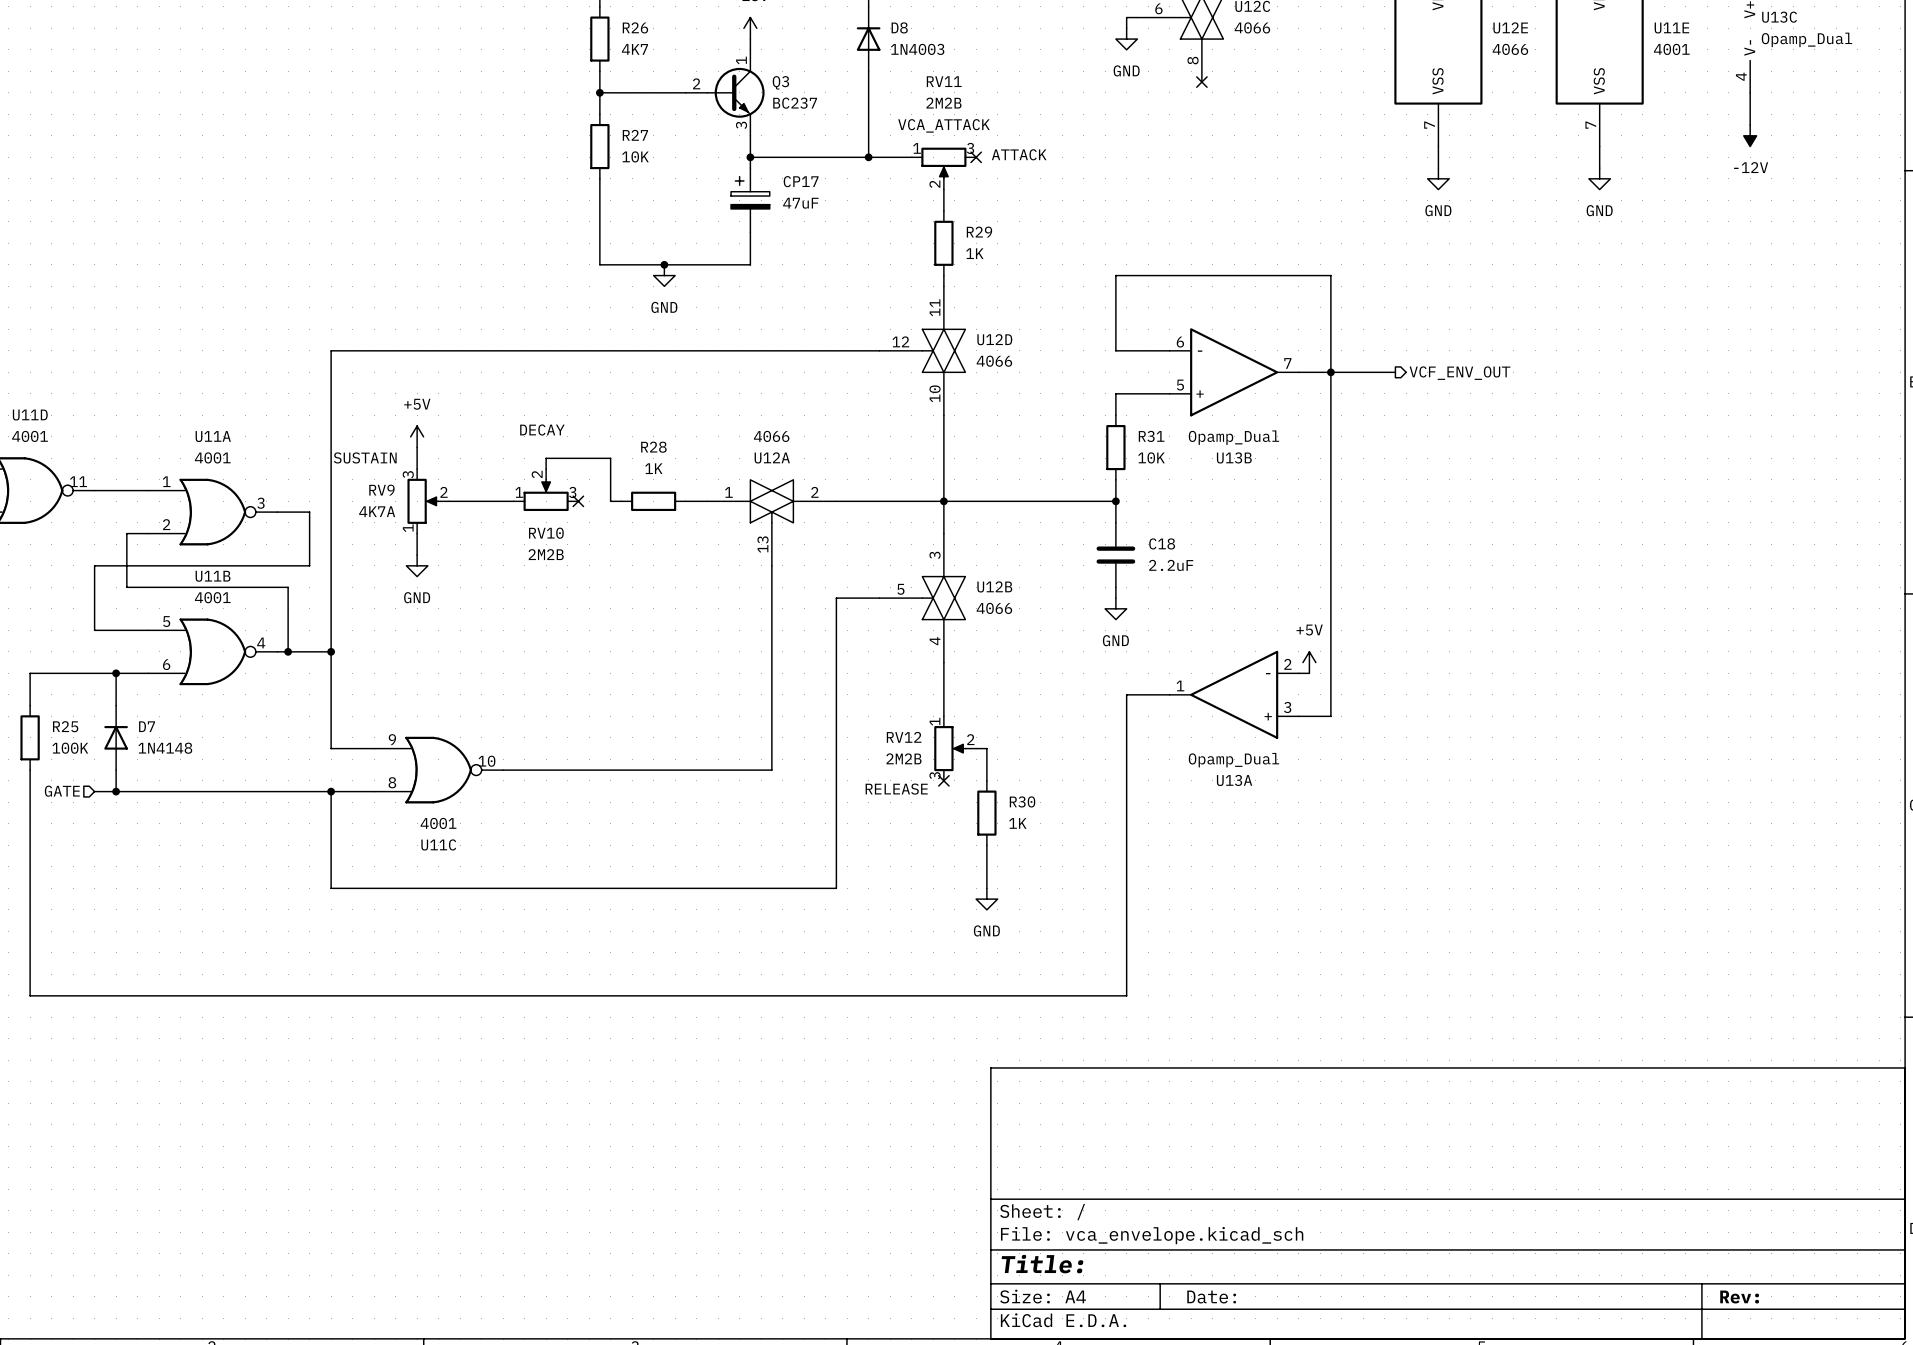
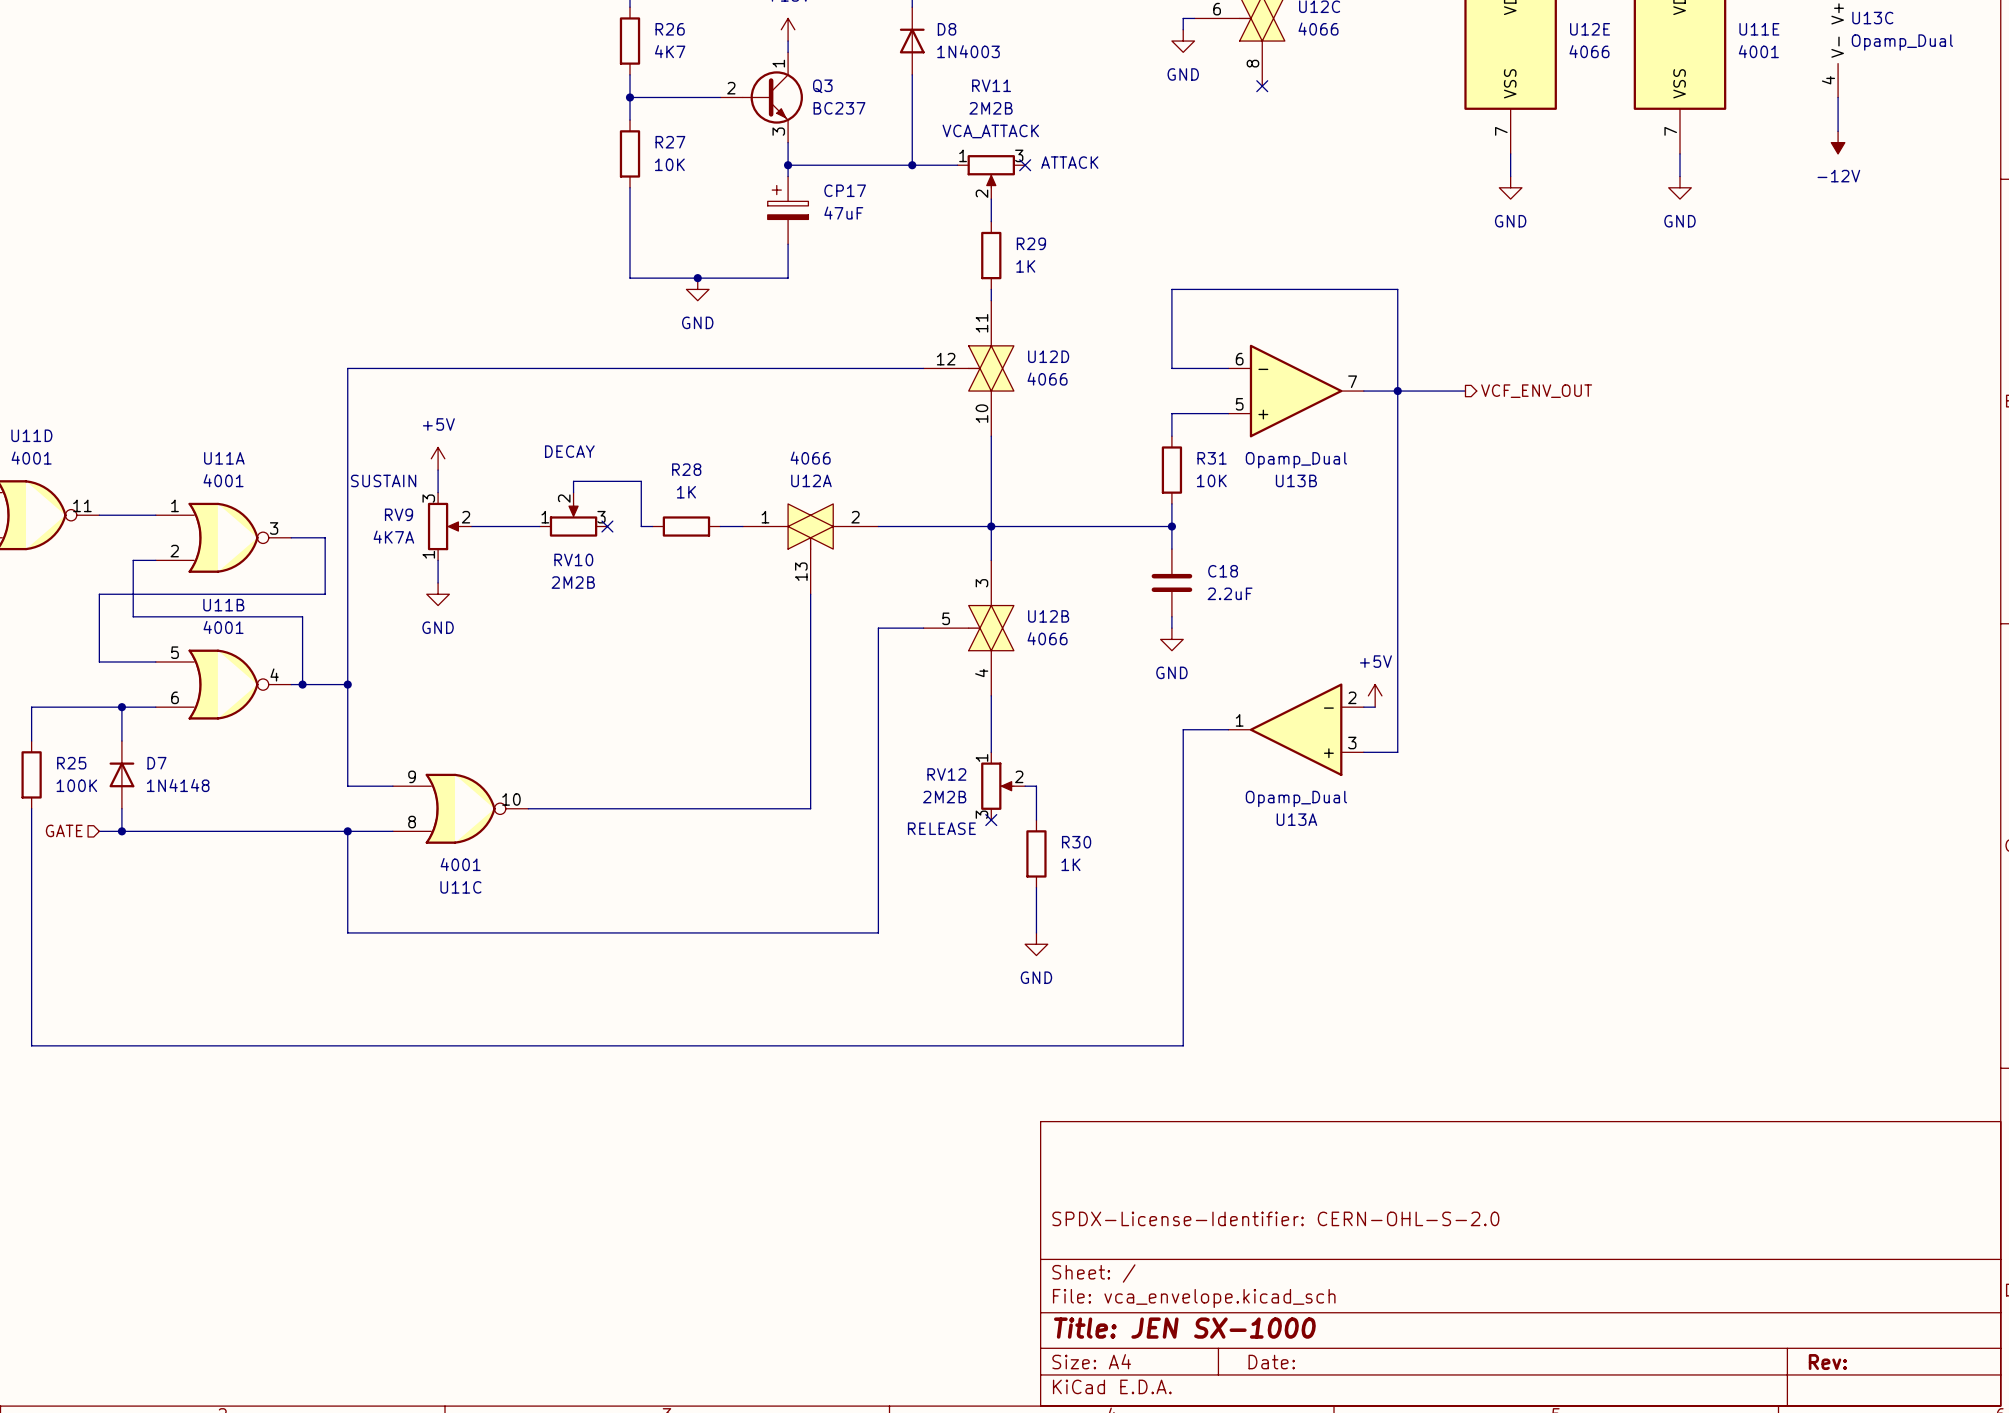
title block: none -> SPDX-License-Identifier: CERN-OHL-S-2.0 (1275, 1218)
title block: Title: (1042, 1264) -> Title: JEN SX-1000 (1184, 1328)

